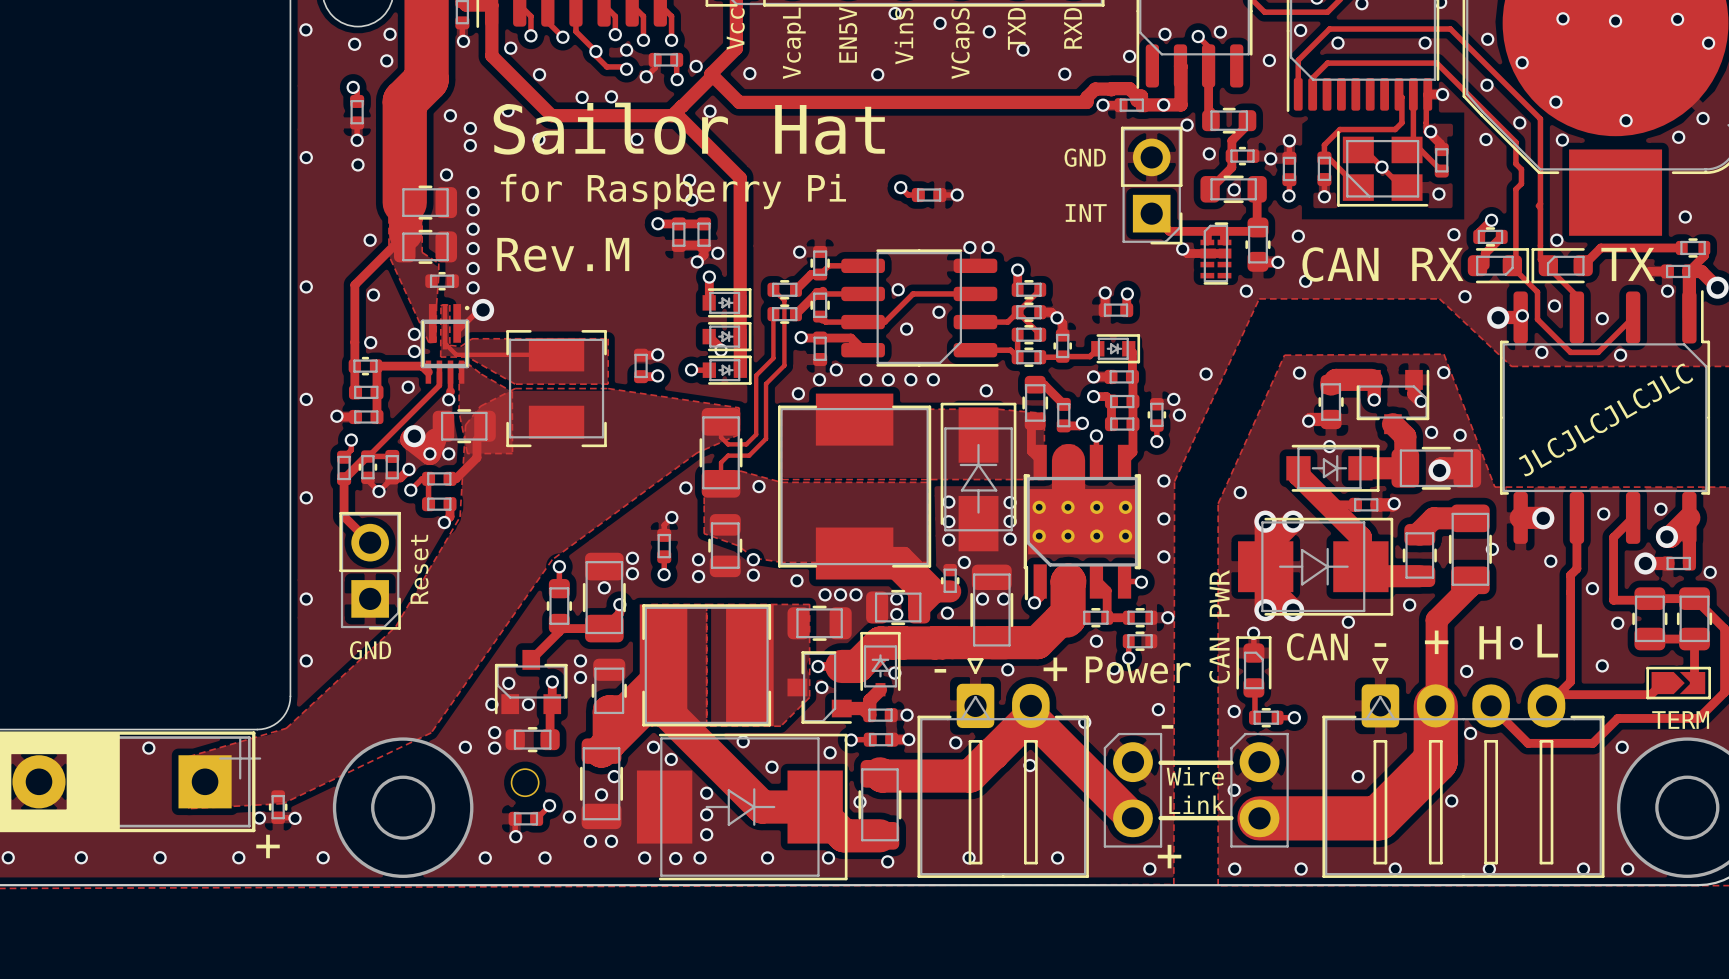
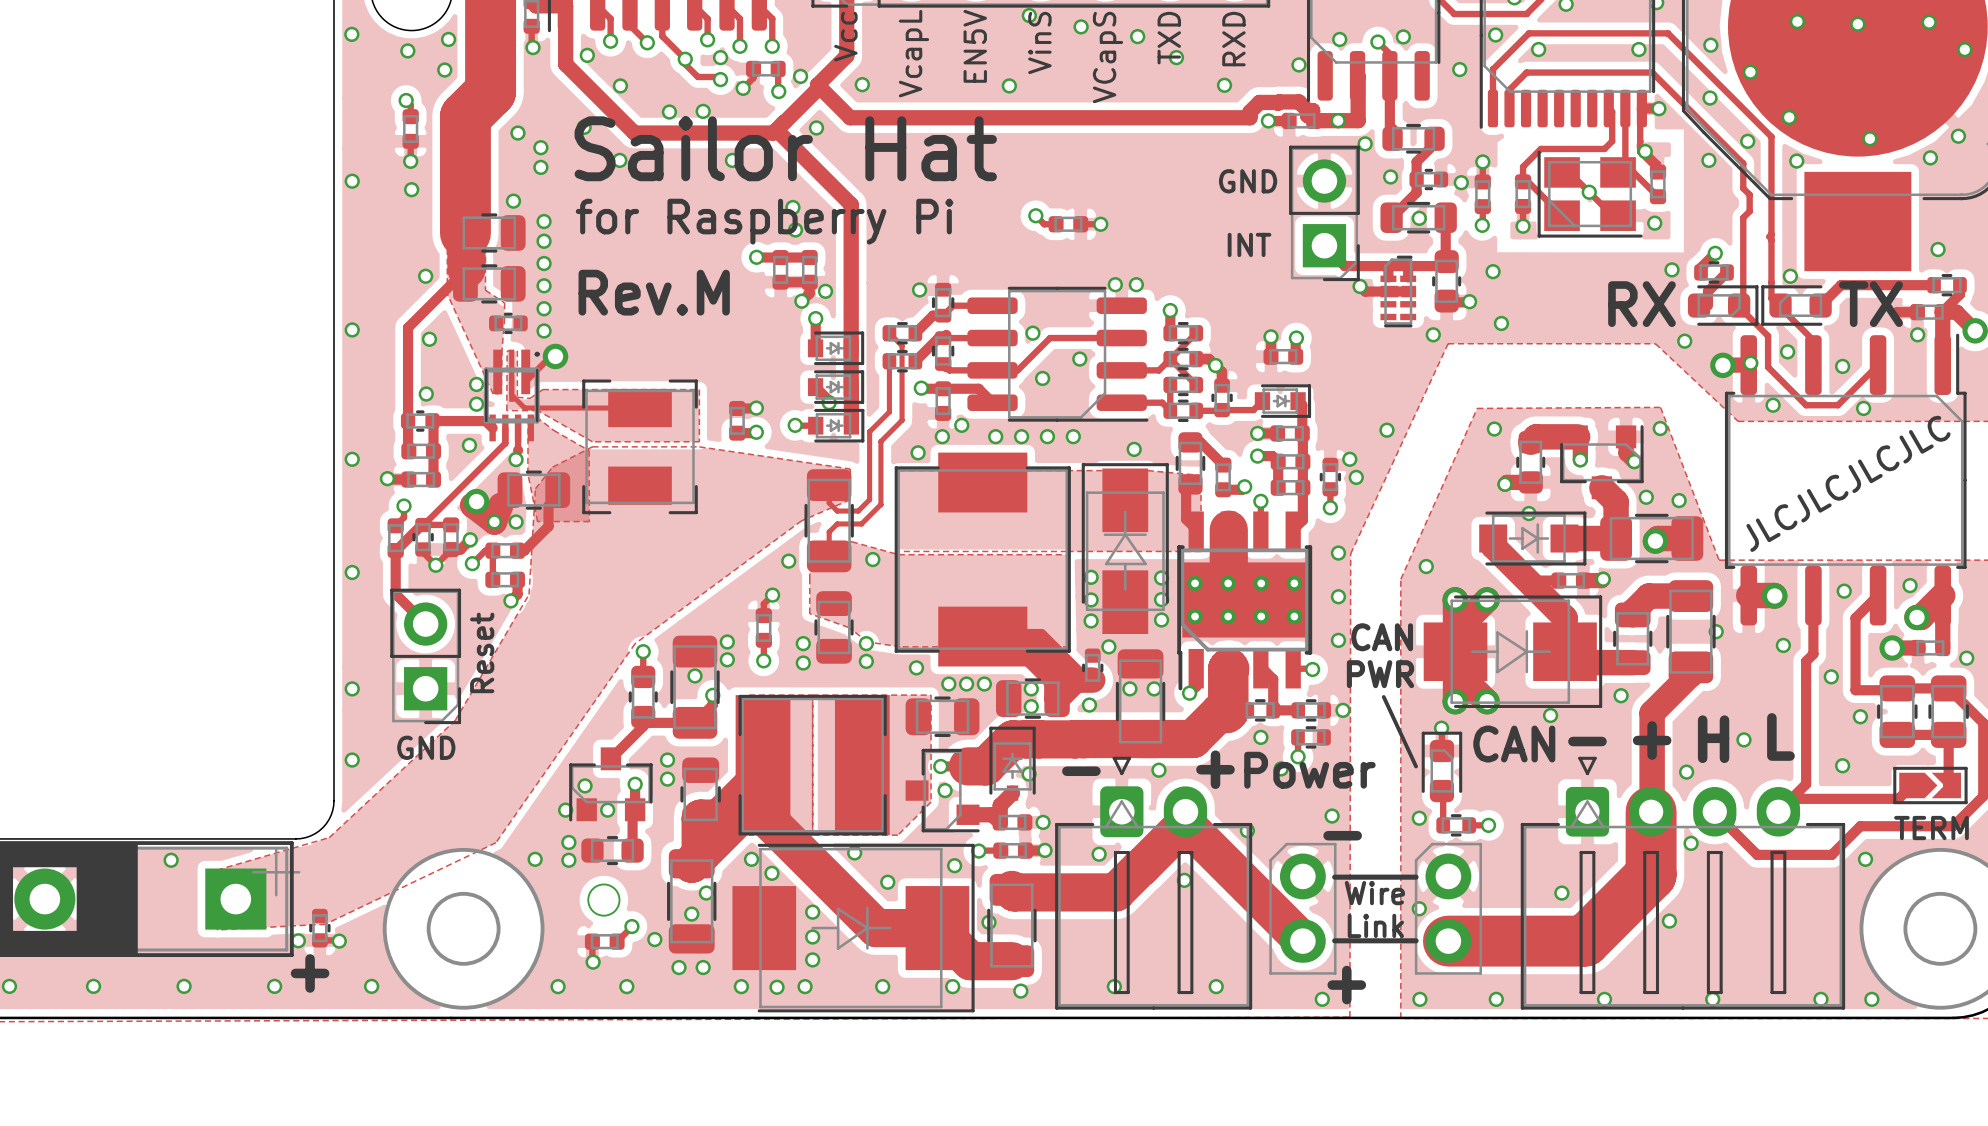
text: CAN RX (1382, 264) -> none
text: none -> RX (1641, 304)
text: none -> CAN (1382, 637)
text: none -> PWR (1380, 674)
line: none -> (1383, 696) (1416, 766)
text: CAN PWR (1219, 626) -> none

